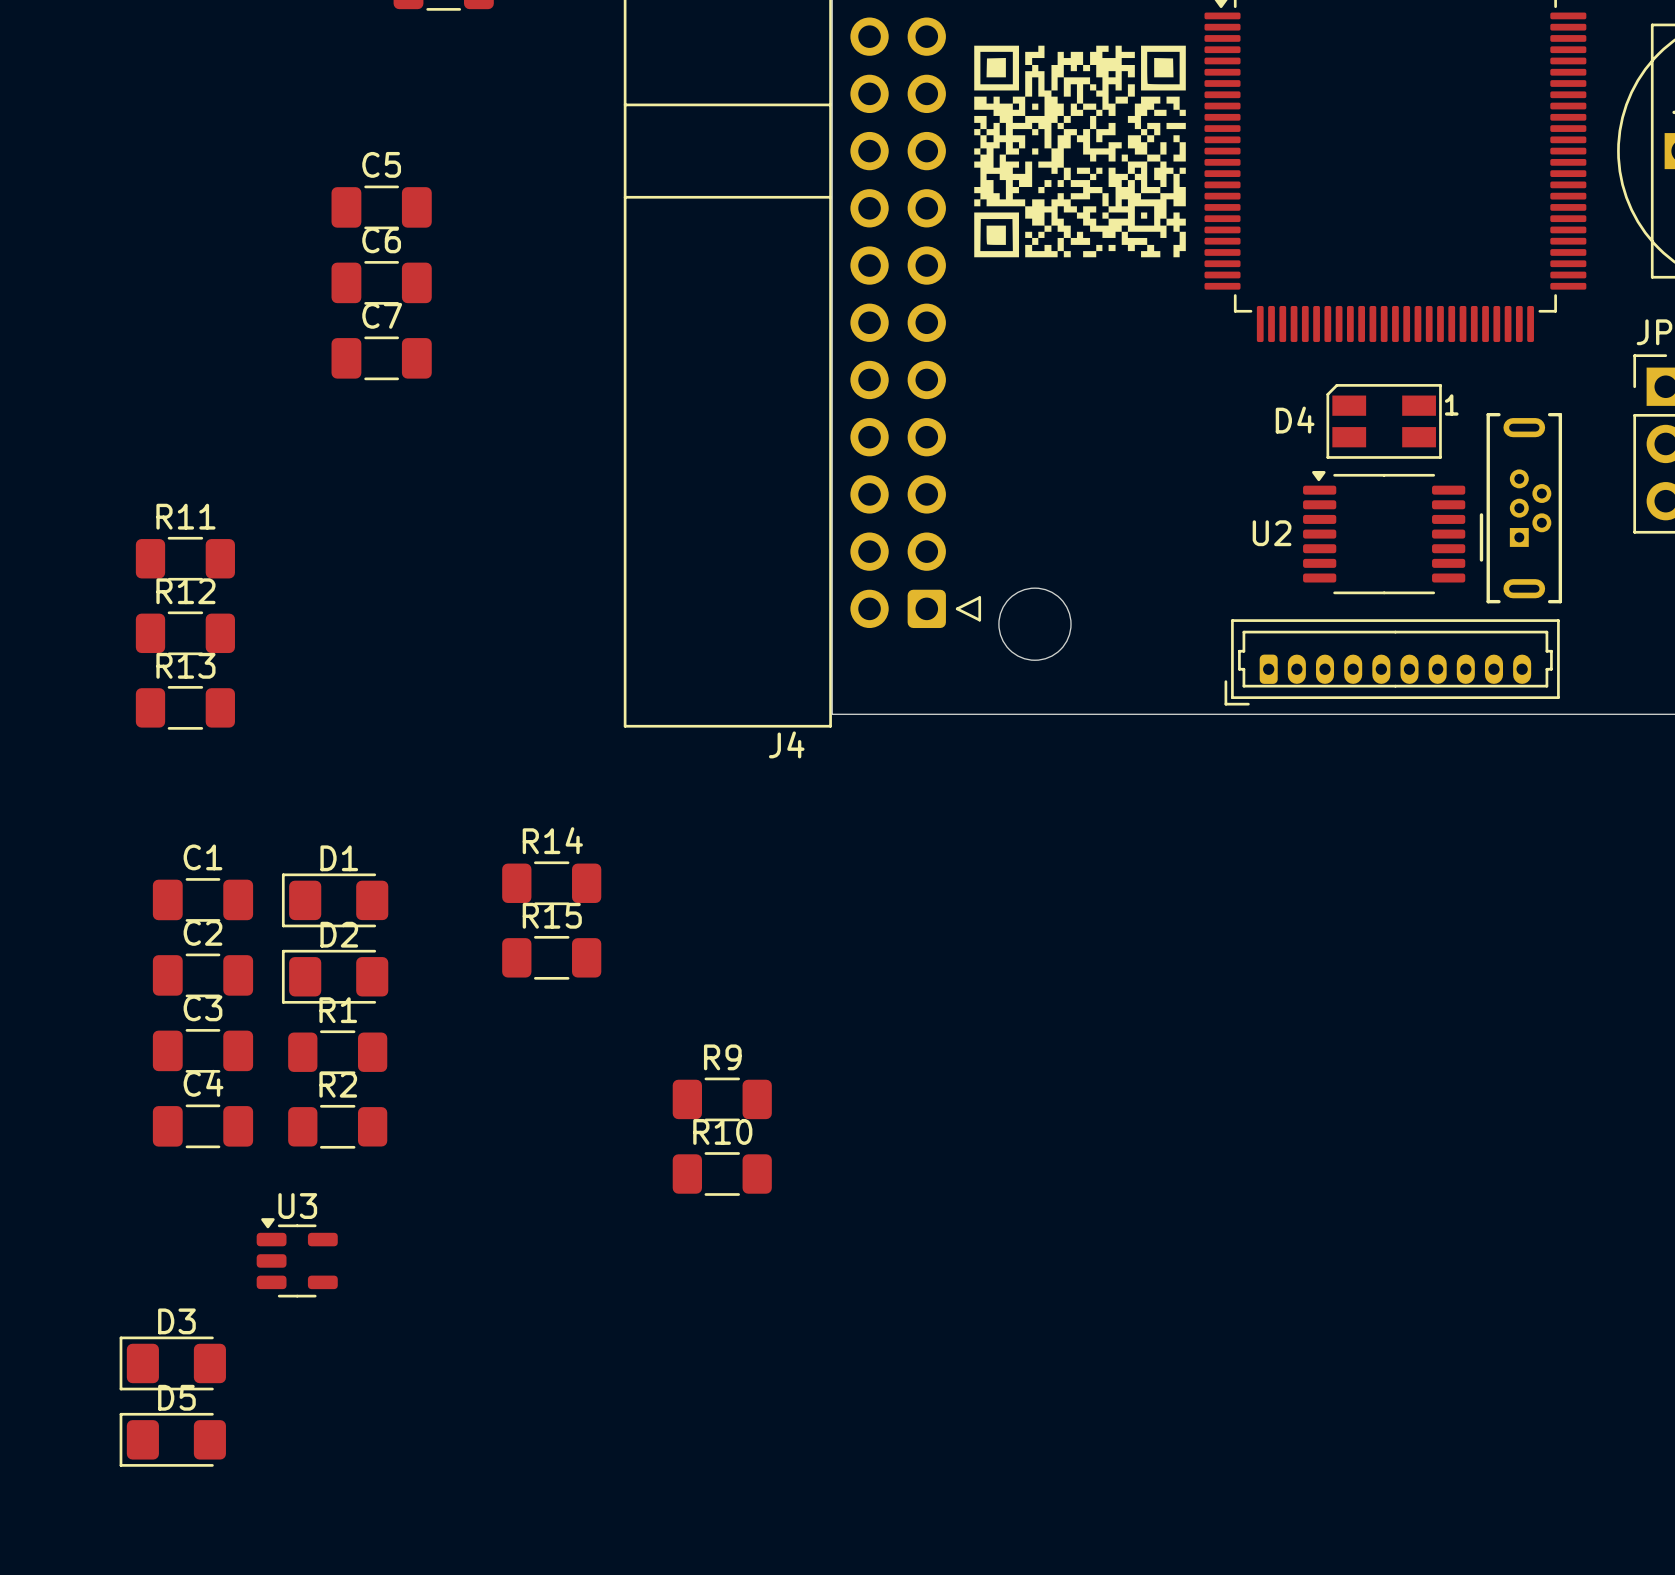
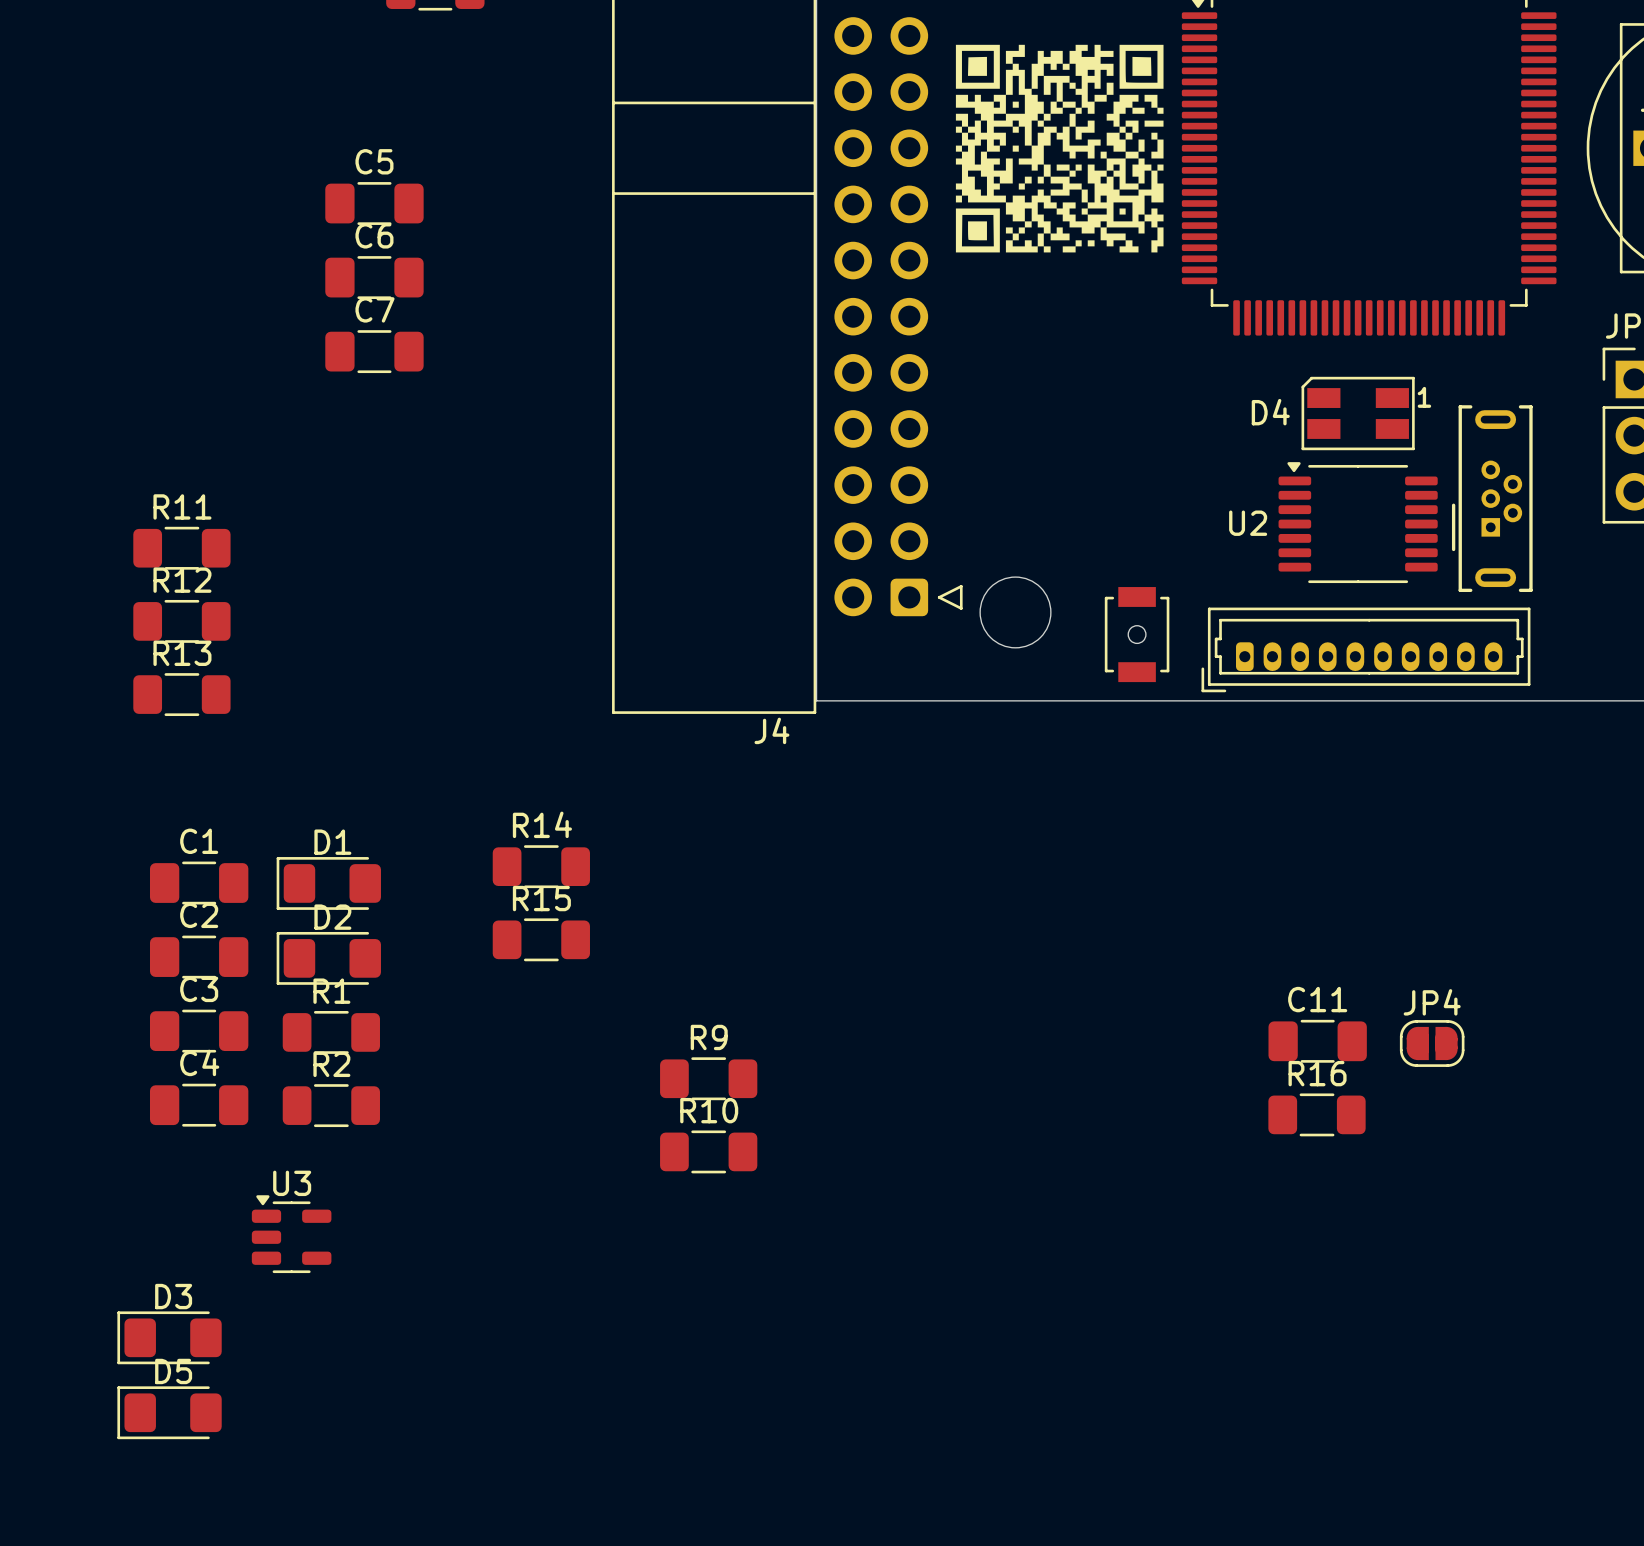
part: none -> (1137, 634)
C11: none -> (1317, 1041)
JP4: none -> (1432, 1043)
R16: none -> (1317, 1114)

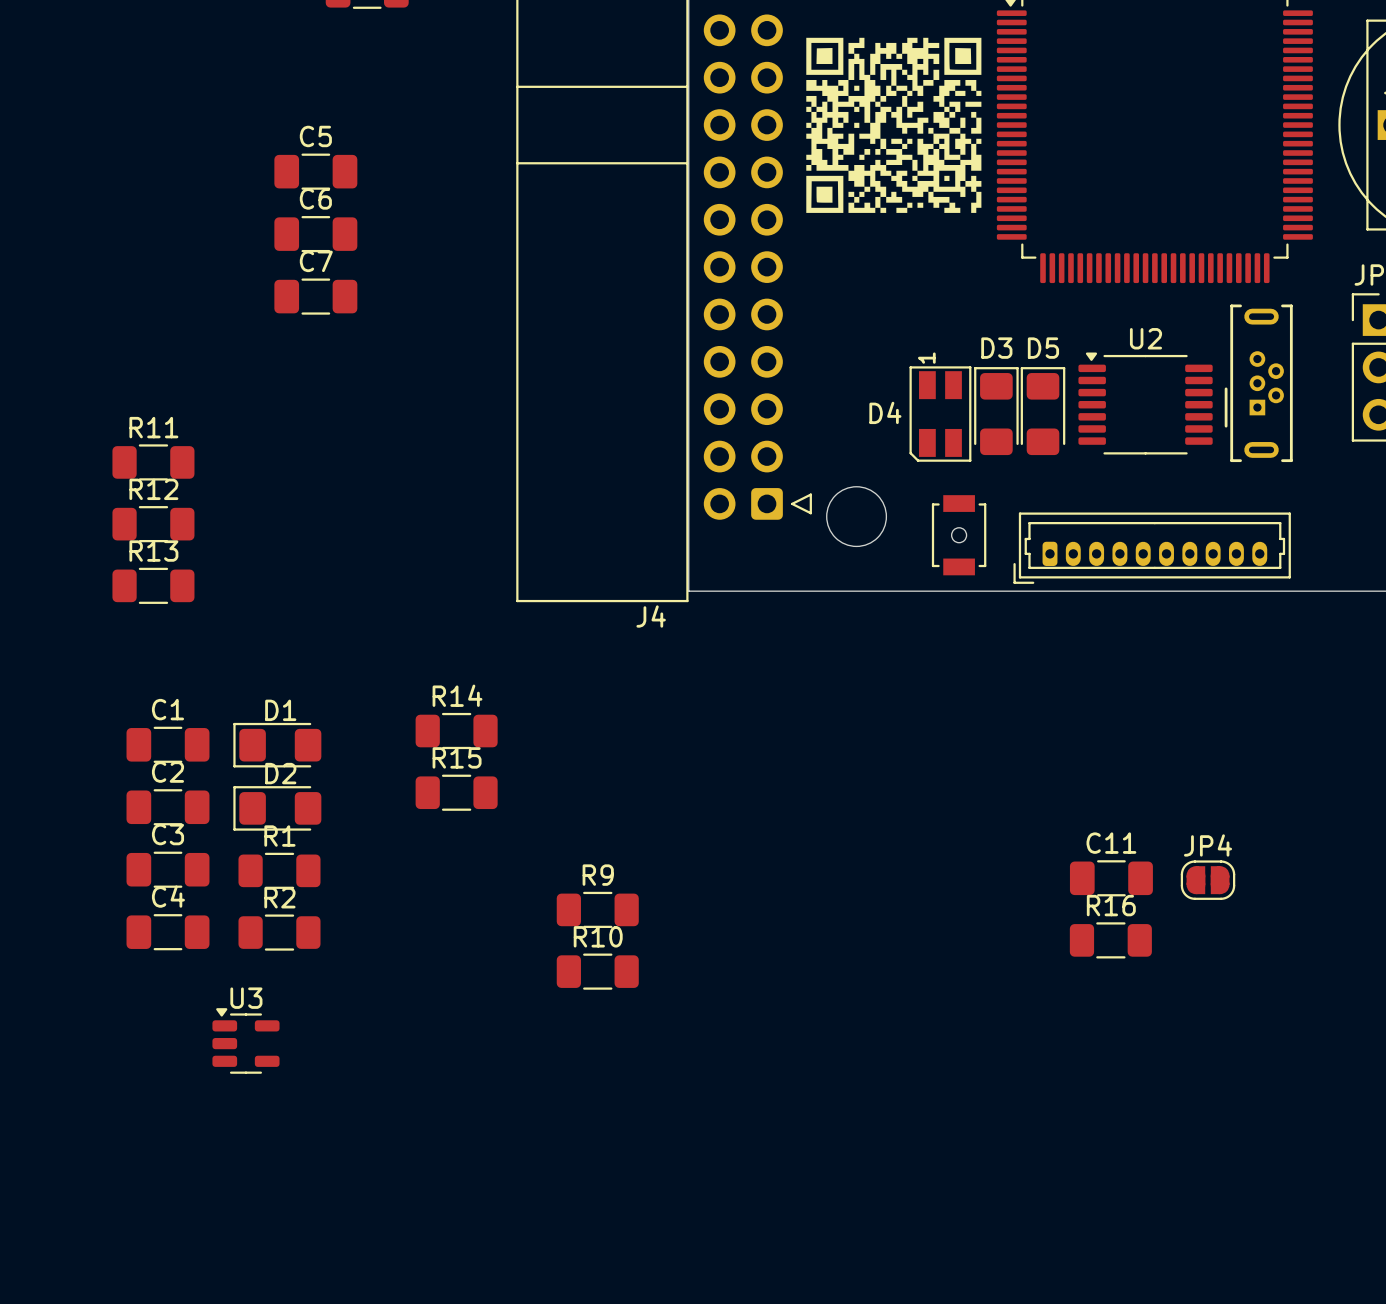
D4 rotation: 0° (1358, 413) -> 90° counterclockwise (940, 414)
D4 position: (1358, 413) -> (940, 414)
part position: (1492, 498) -> (1258, 383)
U2 position: (1358, 522) -> (1145, 403)
U2 name position: U2 (1248, 523) -> U2 (1145, 338)
D3 rotation: 0° (169, 1337) -> 90° clockwise (996, 411)
D3 position: (169, 1337) -> (996, 411)
D5 rotation: 0° (169, 1412) -> 90° clockwise (1043, 411)
D5 position: (169, 1412) -> (1043, 411)

